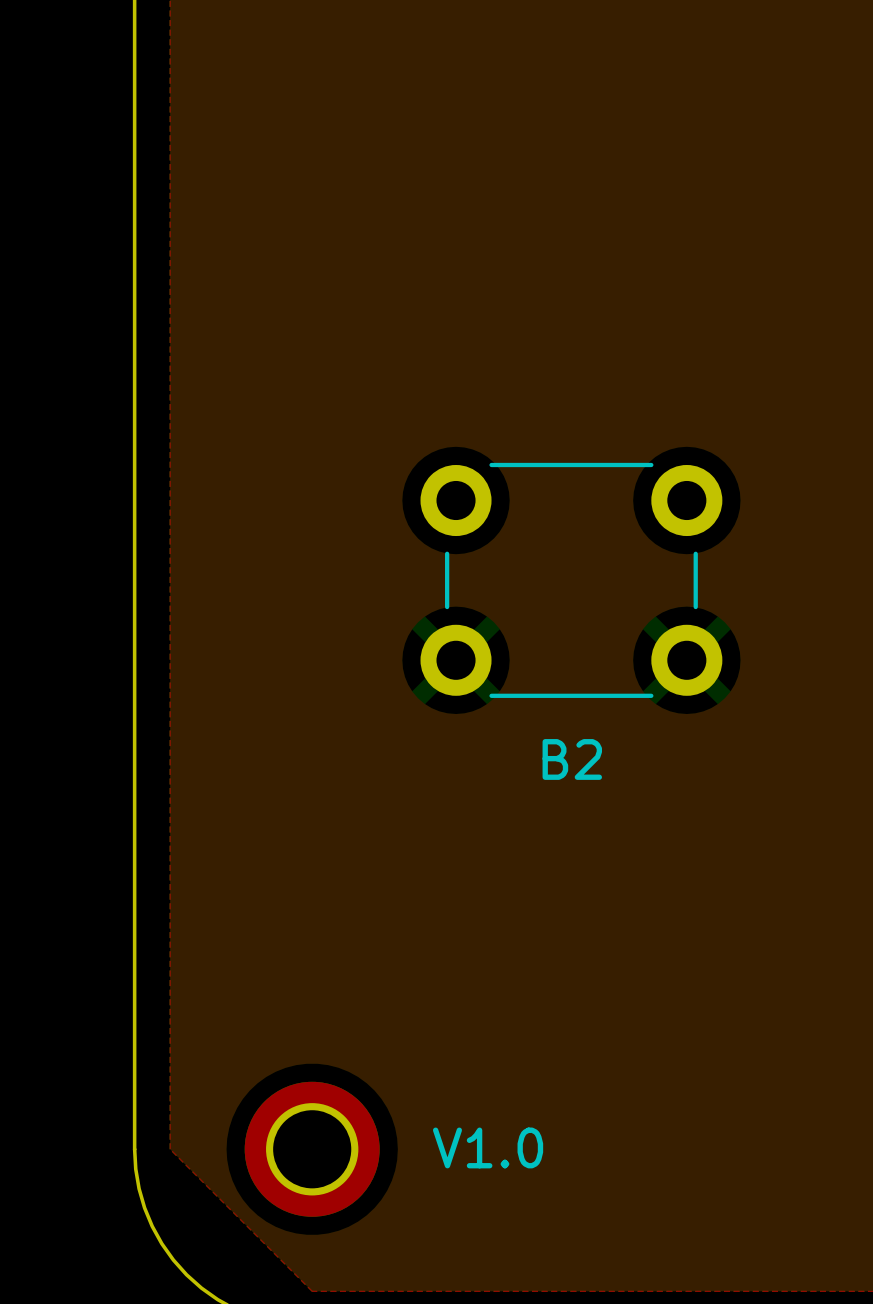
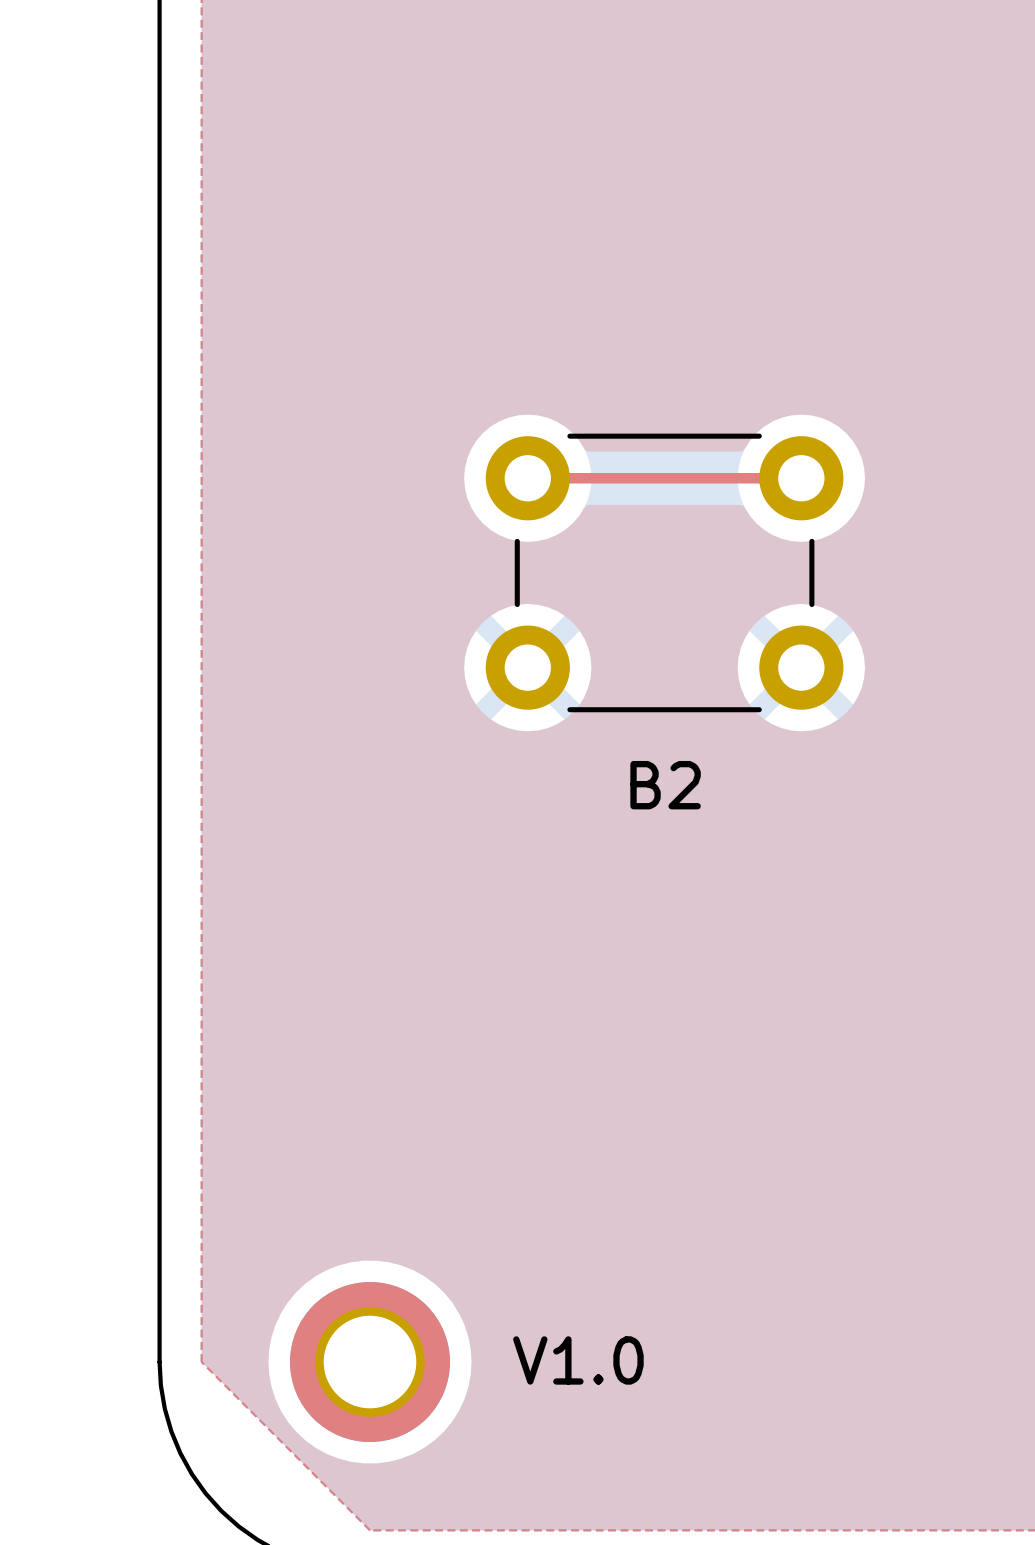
top track: none -> (527, 478) (801, 478)
B2 position: (571, 580) -> (664, 572)

